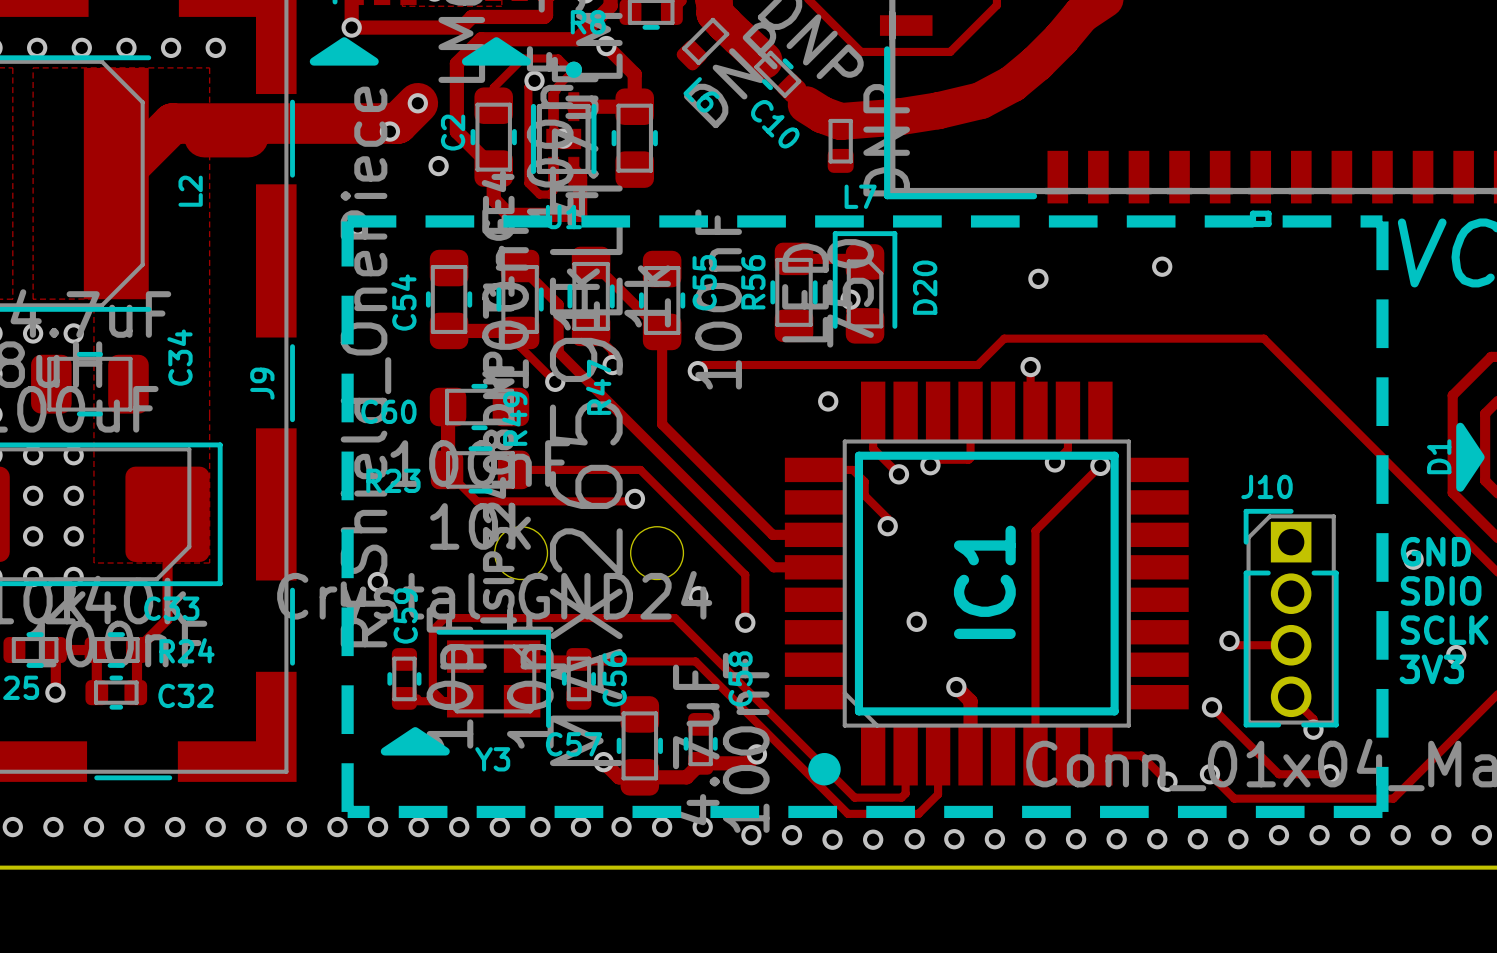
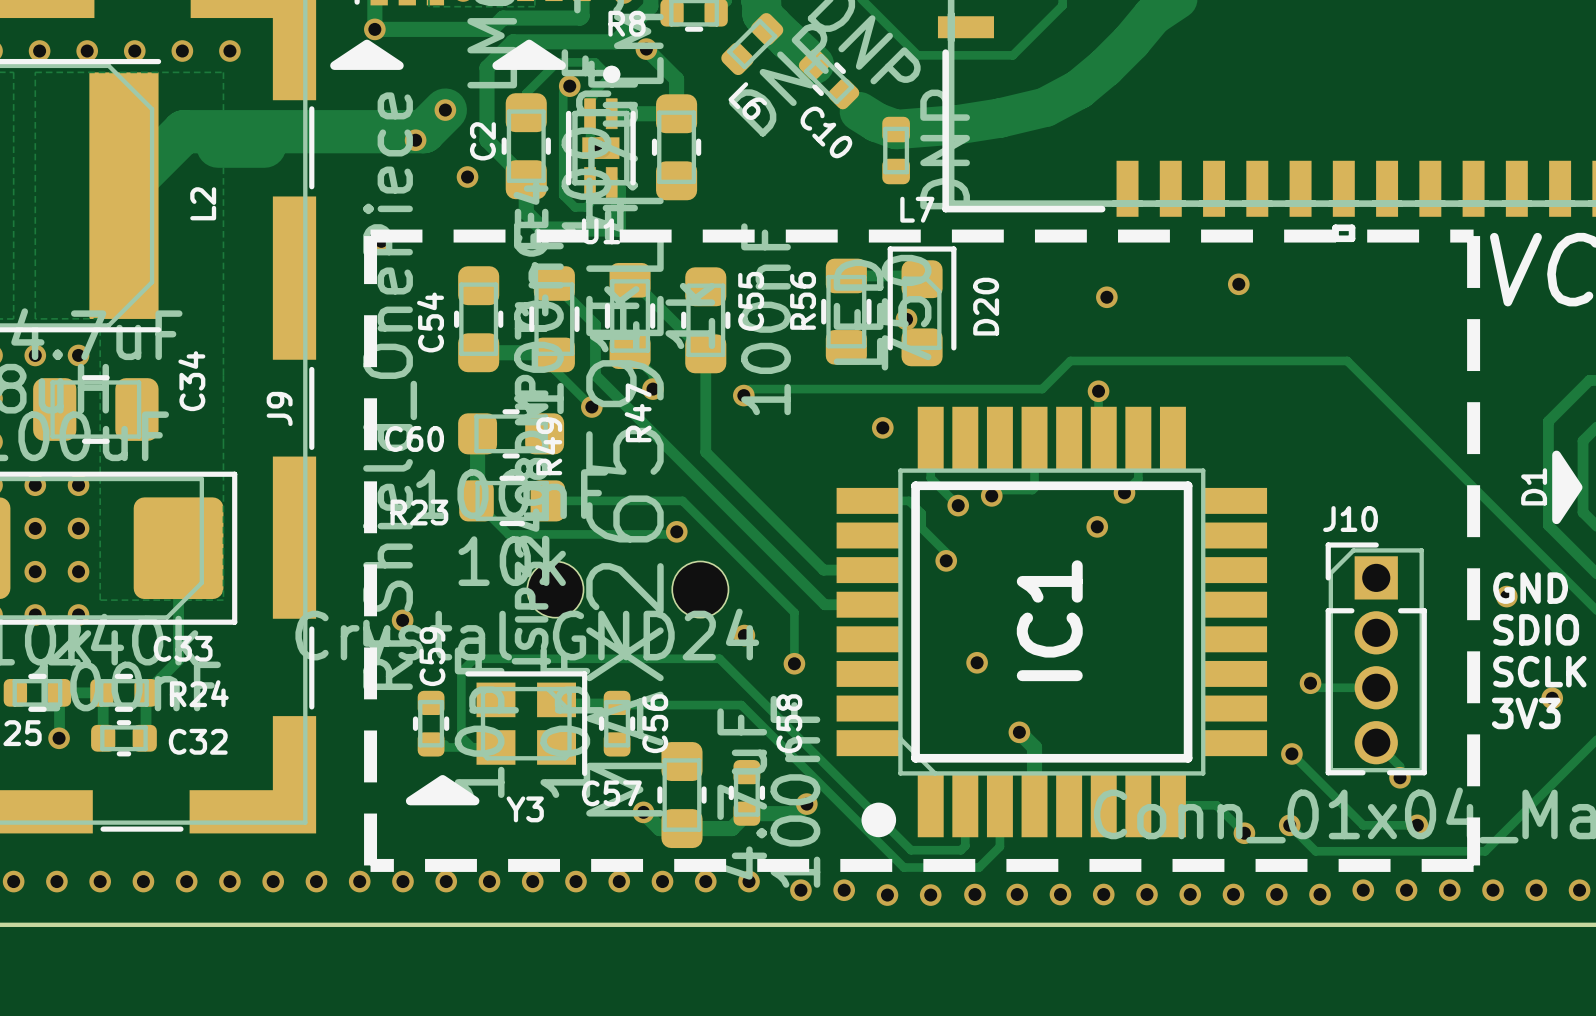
track: (1100, 465) (1035, 530) (1035, 755) -> none
via position: (1100, 465) -> (1097, 526)

